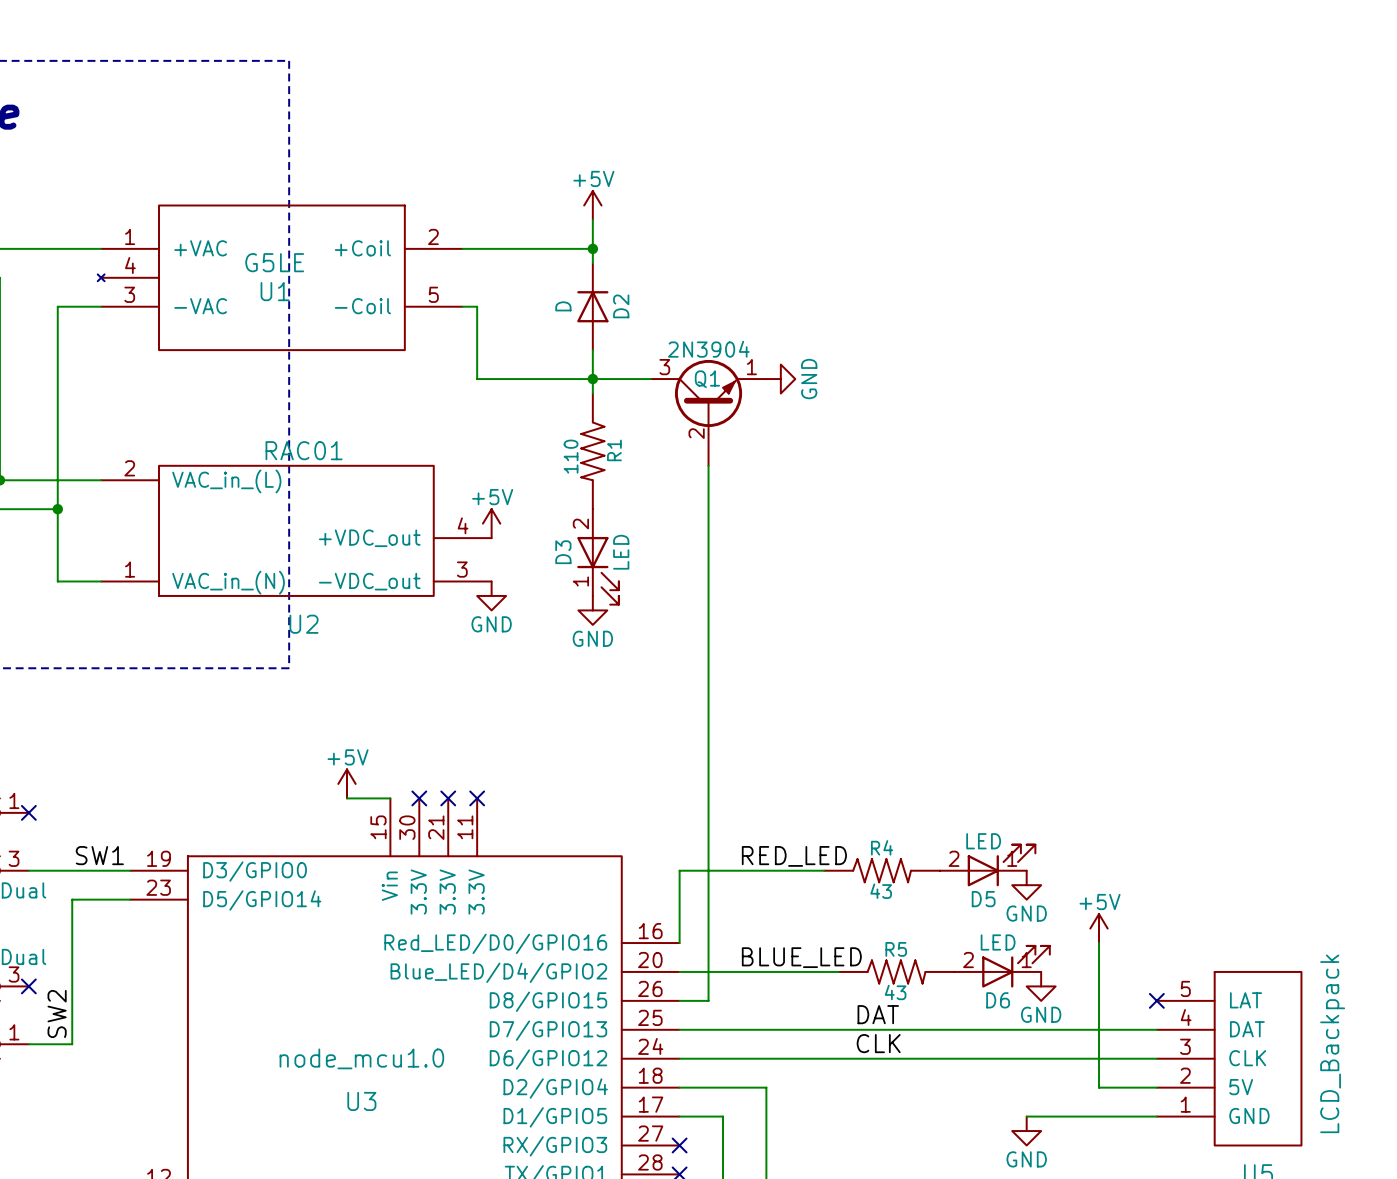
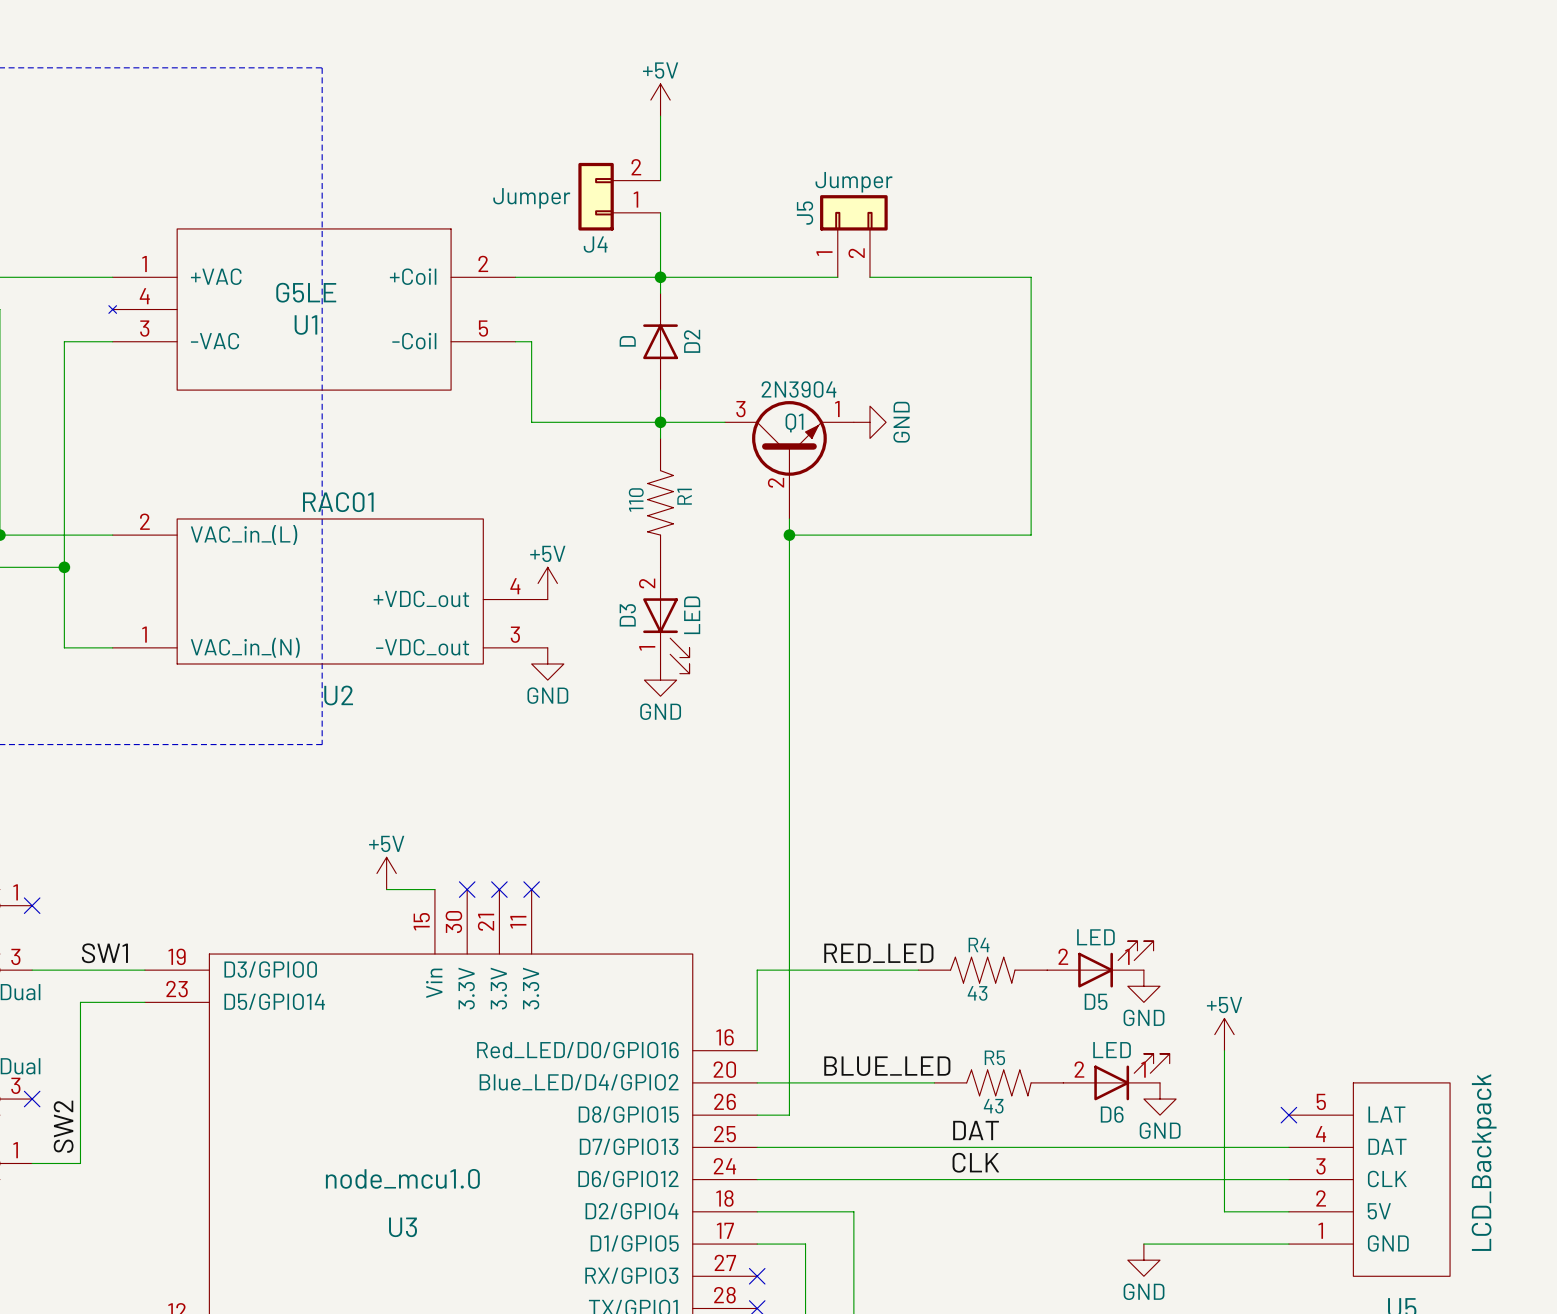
wire: none -> (660, 116) (660, 180)
J4: none -> Jumper (619, 196)
power symbol position: +5V (592, 205) -> +5V (660, 100)
J5: none -> Jumper (853, 236)
wire: none -> (660, 277) (837, 277)
wire: none -> (869, 277) (1031, 277) (1031, 535) (789, 535)
junction: none -> (789, 535)

